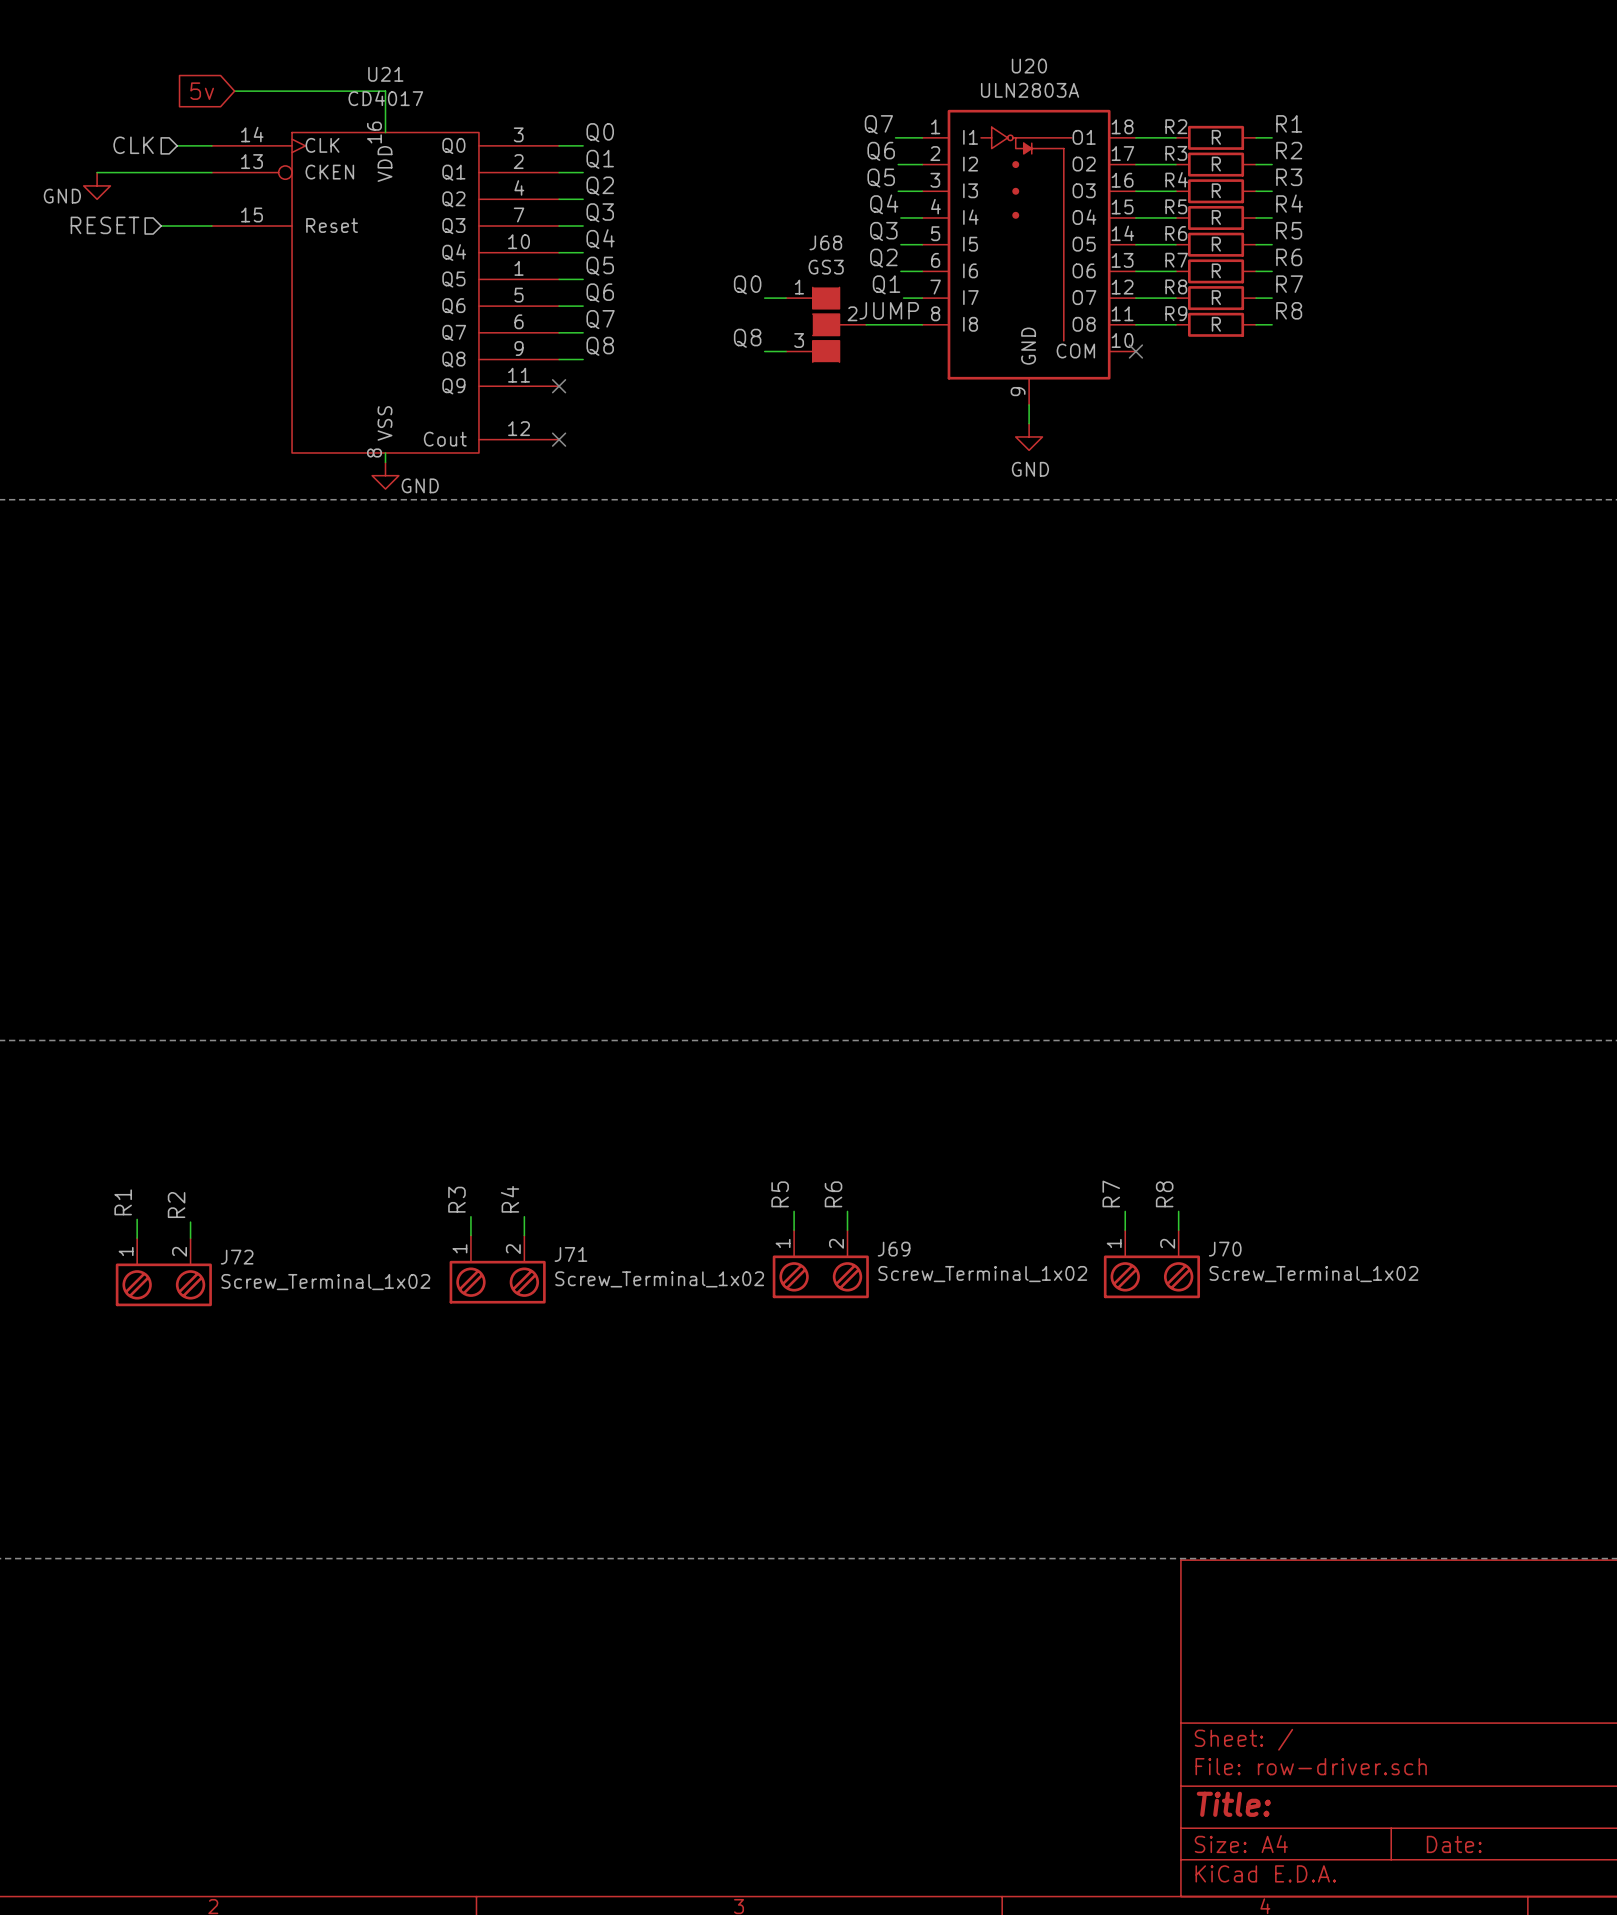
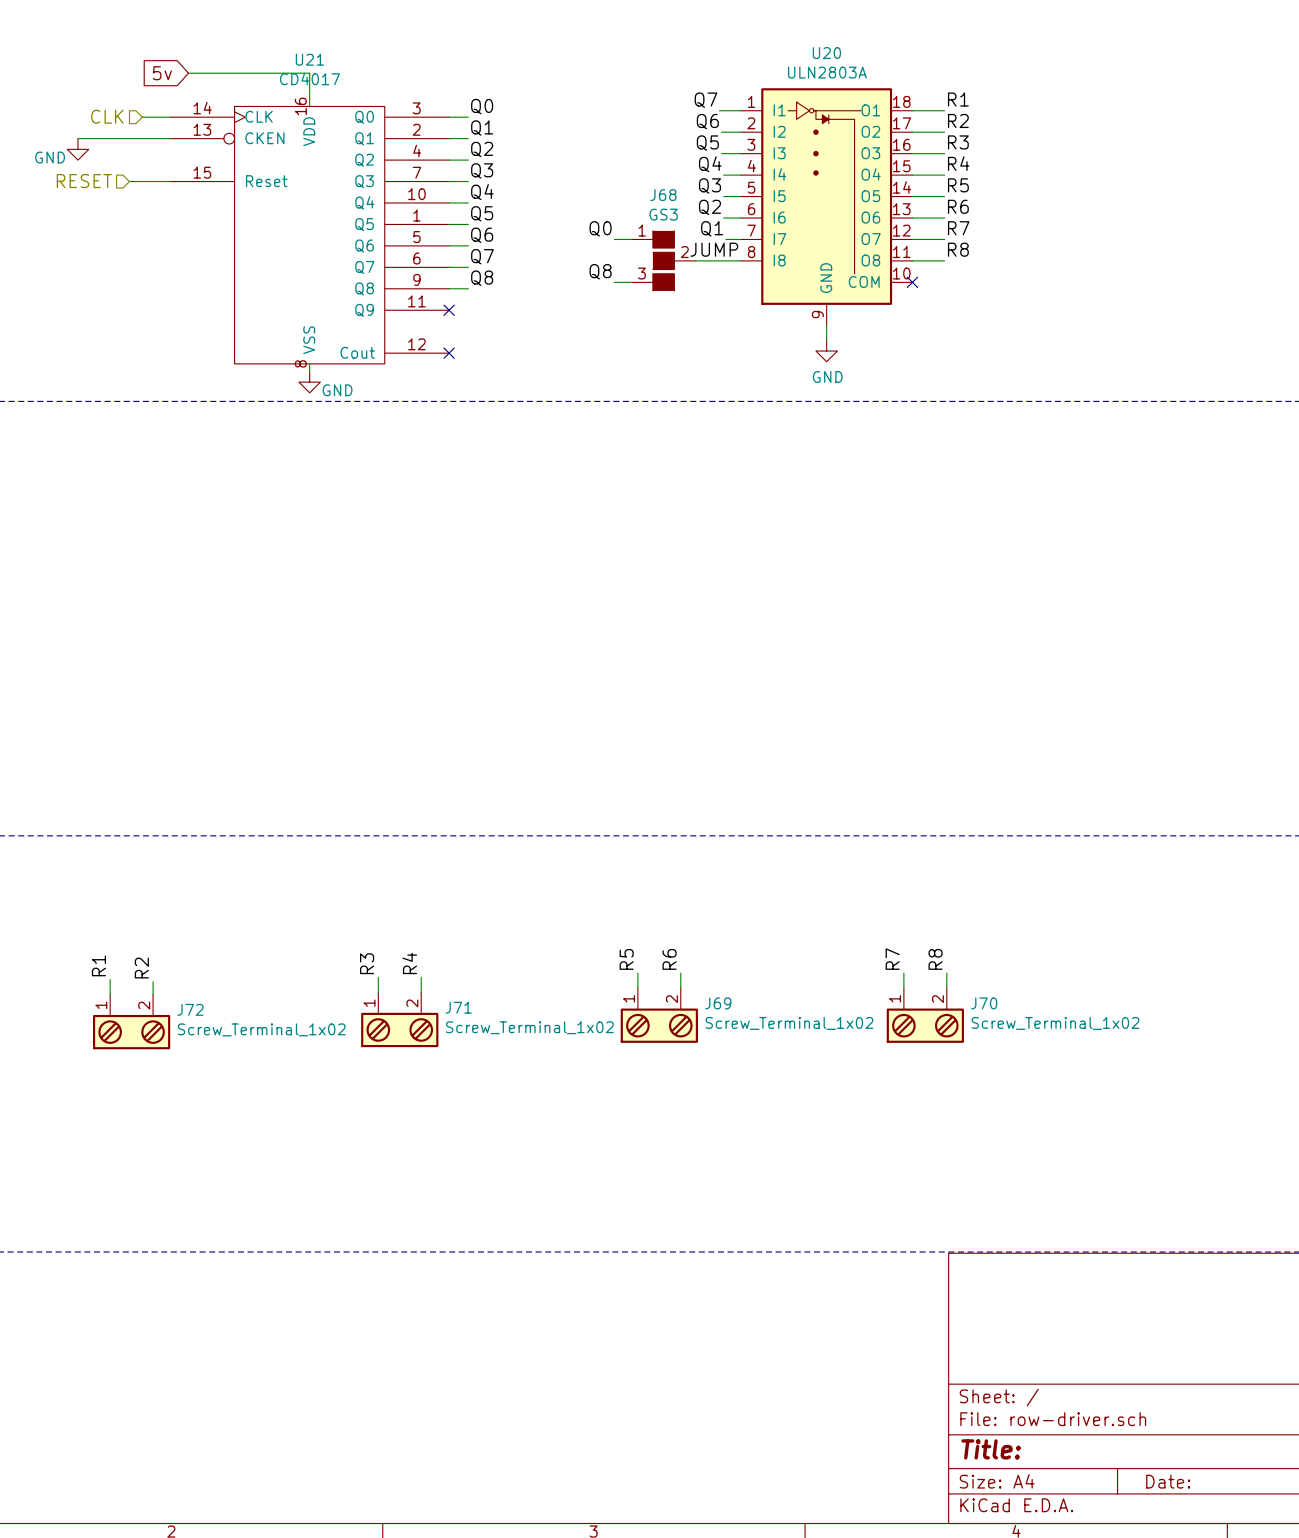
label position: R1 (1289, 123) -> R1 (958, 99)
R2: R (1216, 137) -> none
wire: (1256, 137) (1272, 137) -> none
label position: R2 (1289, 150) -> R2 (958, 120)
R3: R (1216, 164) -> none
wire: (1256, 164) (1272, 164) -> none
label position: R3 (1289, 177) -> R3 (958, 142)
R4: R (1216, 191) -> none
wire: (1256, 191) (1272, 191) -> none
label position: R4 (1289, 203) -> R4 (958, 163)
R5: R (1216, 217) -> none
wire: (1256, 217) (1272, 217) -> none
label position: R5 (1289, 230) -> R5 (958, 185)
R6: R (1216, 244) -> none
wire: (1256, 244) (1272, 244) -> none
label position: R6 (1289, 257) -> R6 (958, 206)
R7: R (1216, 271) -> none
wire: (1256, 271) (1272, 271) -> none
label position: R7 (1289, 284) -> R7 (958, 228)
R8: R (1216, 298) -> none
wire: (1256, 298) (1272, 298) -> none
label position: R8 (1289, 310) -> R8 (958, 249)
R9: R (1216, 324) -> none
wire: (1256, 324) (1272, 324) -> none

